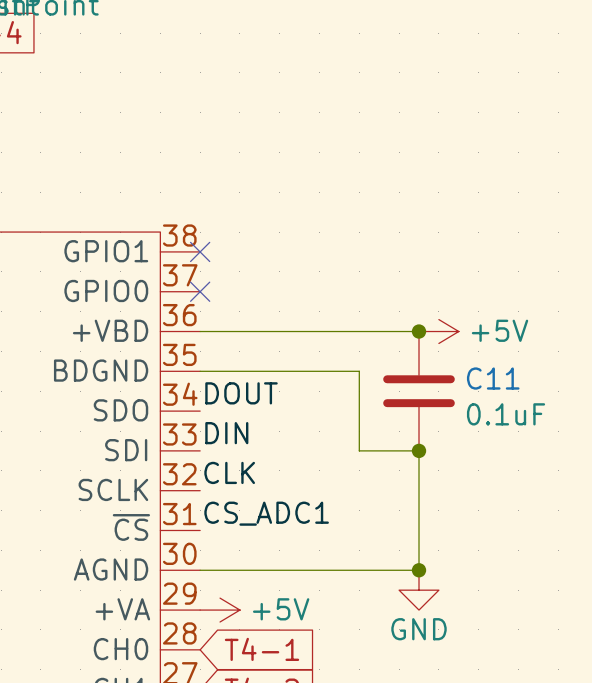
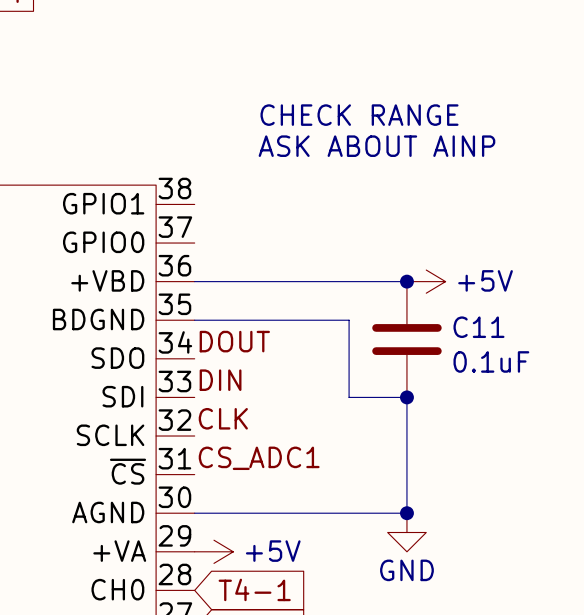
text: none -> CHECK RANGE (359, 115)
text: none -> ASK ABOUT AINP (376, 146)
no-connect mark: (200, 251) -> none
no-connect mark: (200, 291) -> none

